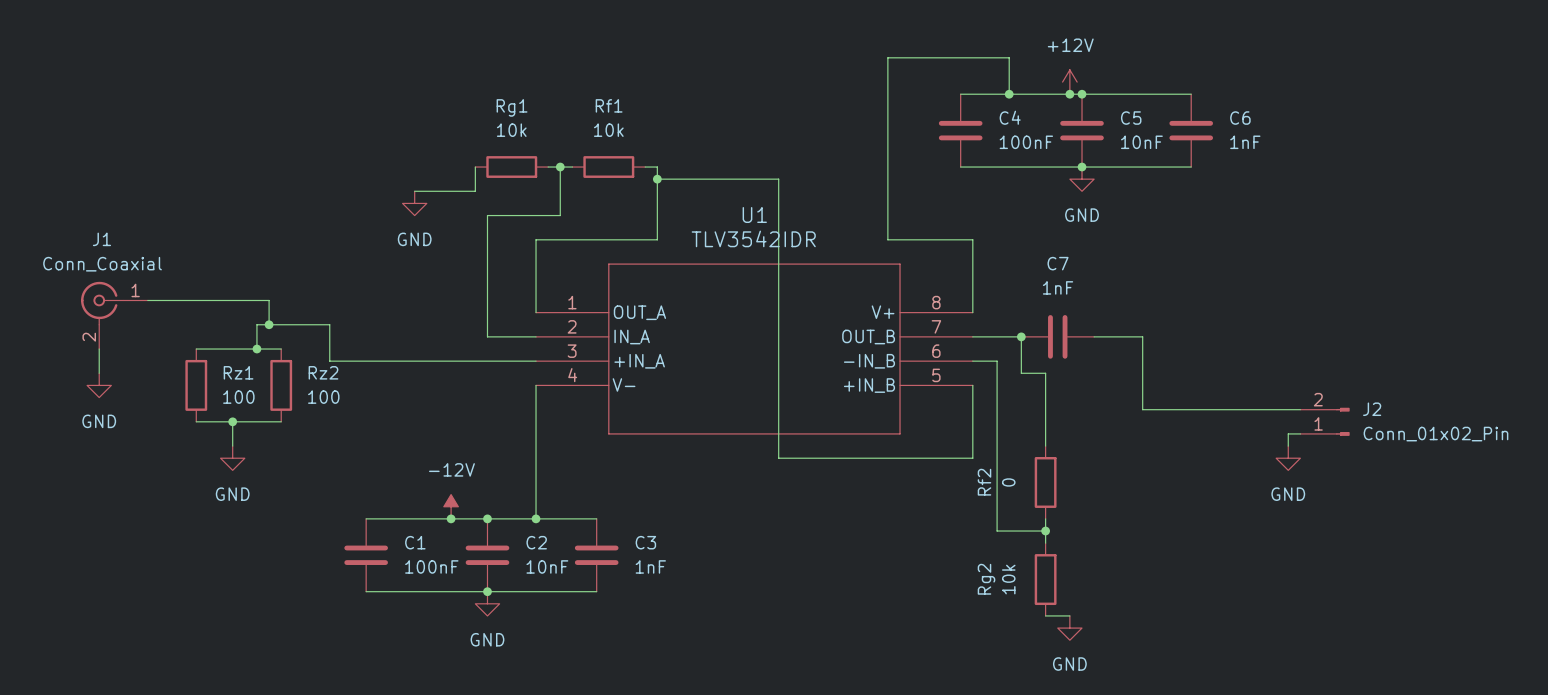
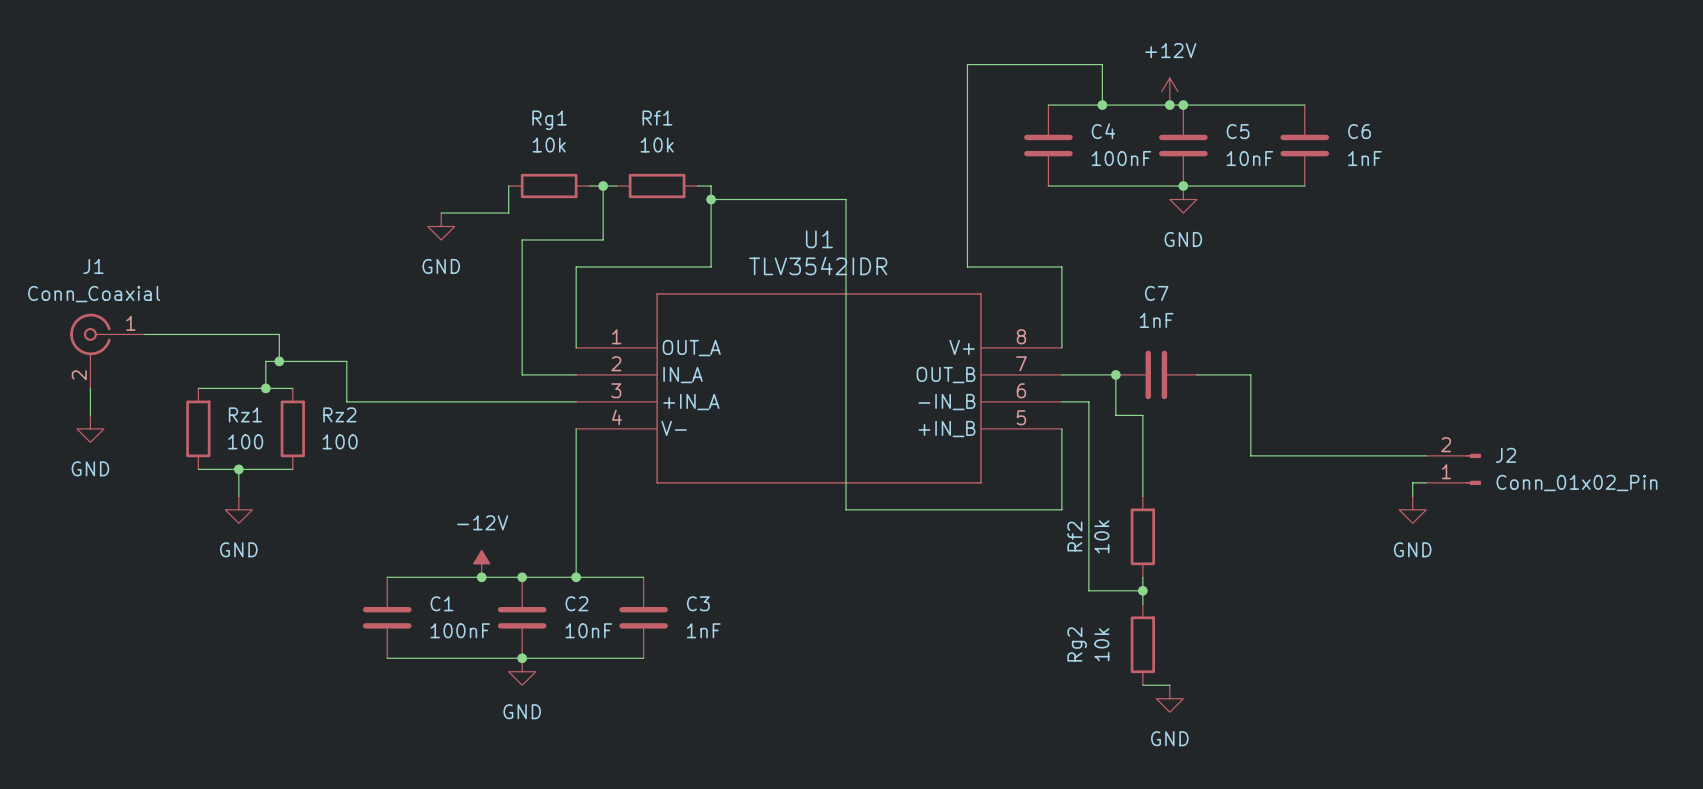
Rf2 value: 0 (1008, 482) -> 10k (1101, 536)

